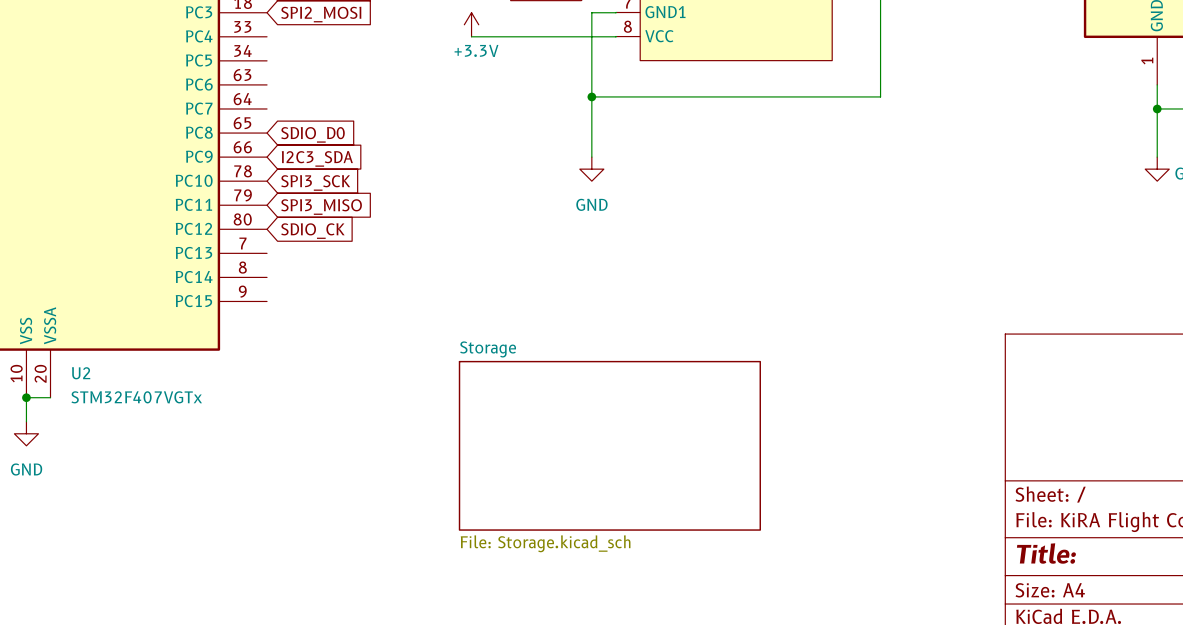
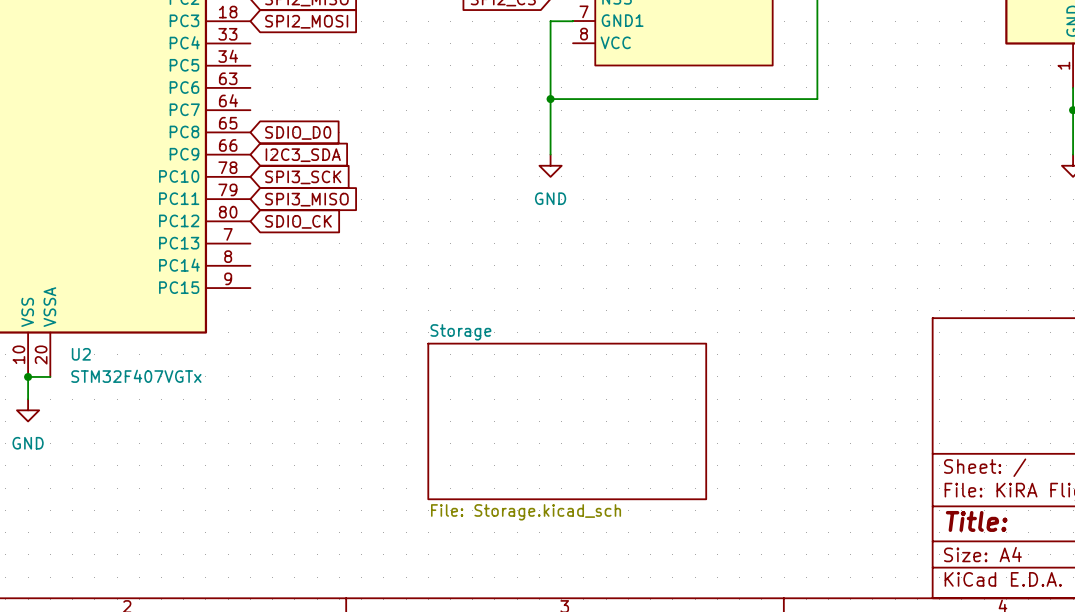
power symbol: +3.3V (471, 24) -> none
wire: (616, 36) (471, 36) -> none

